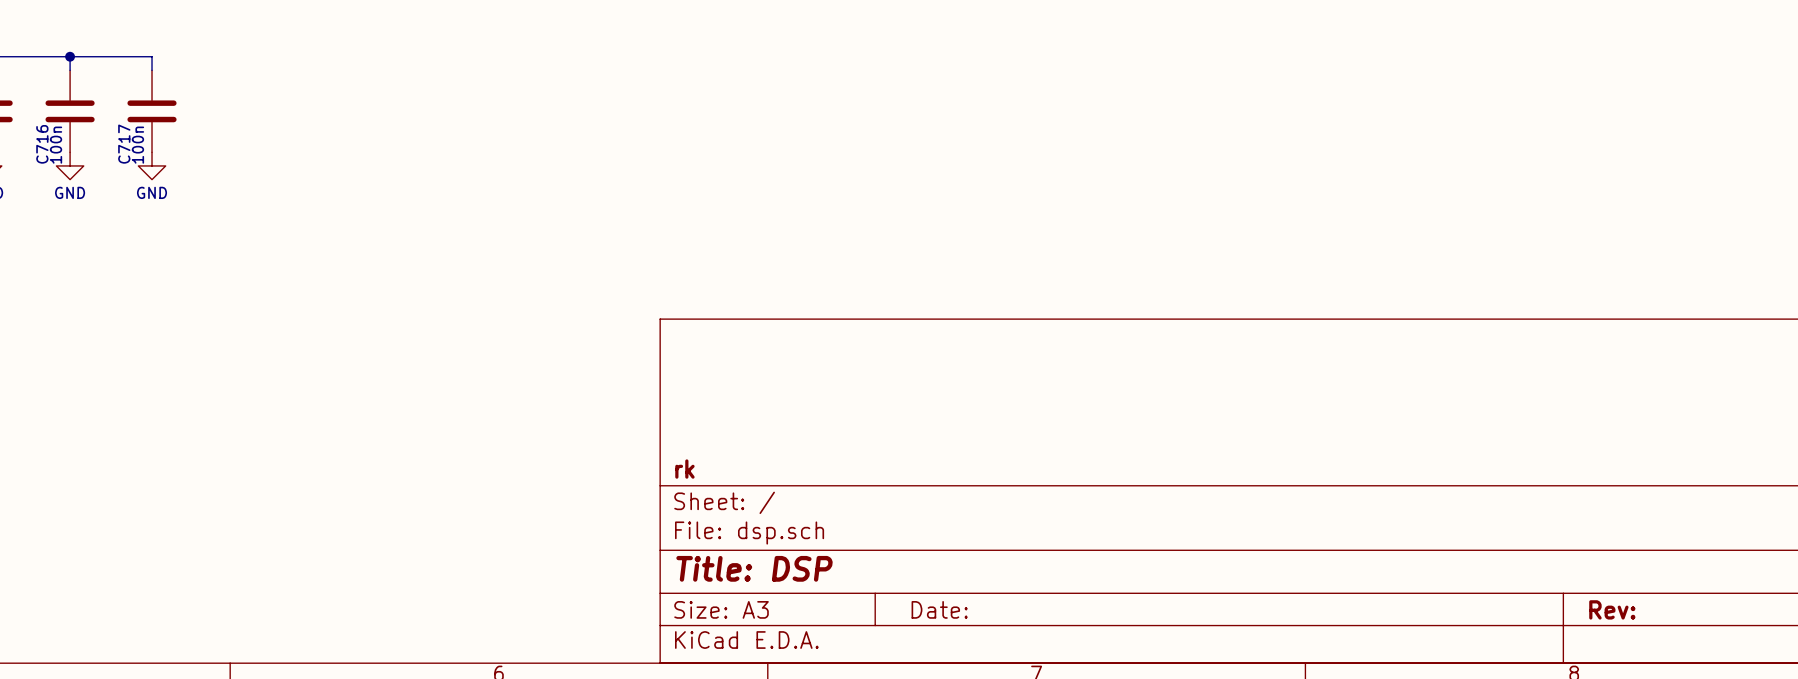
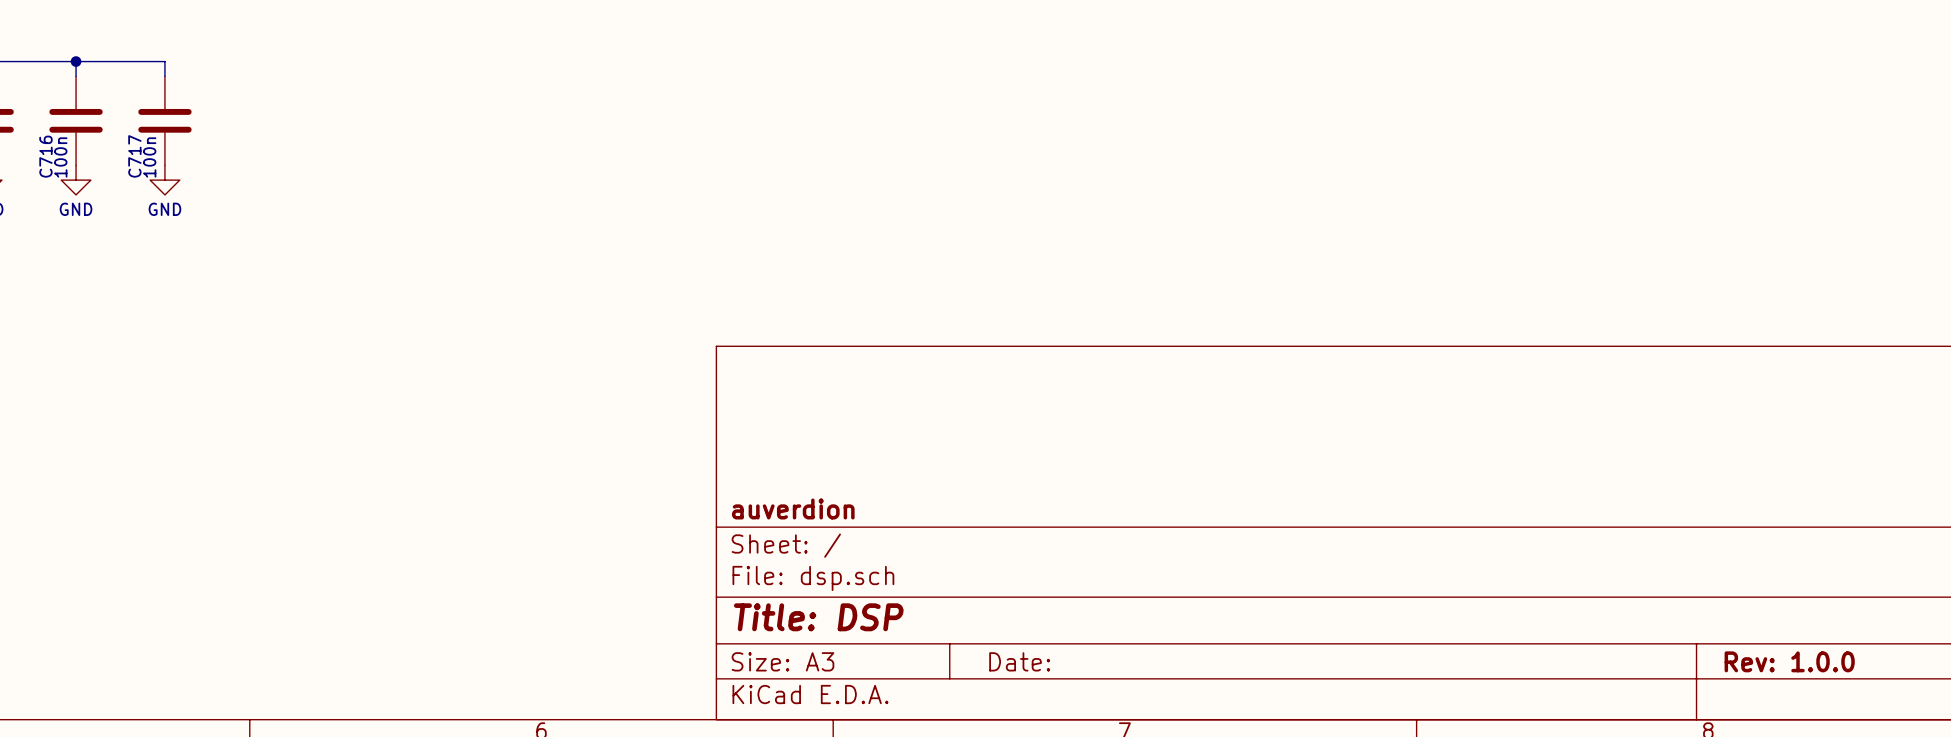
title block: rk (684, 469) -> auverdion (793, 508)
title block: Rev: (1612, 609) -> Rev: 1.0.0 (1789, 661)

